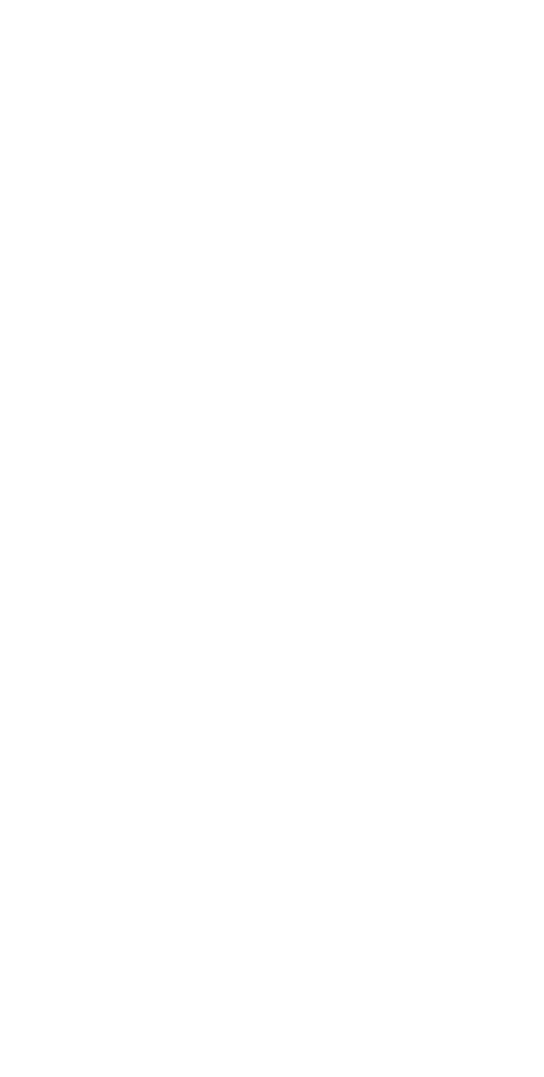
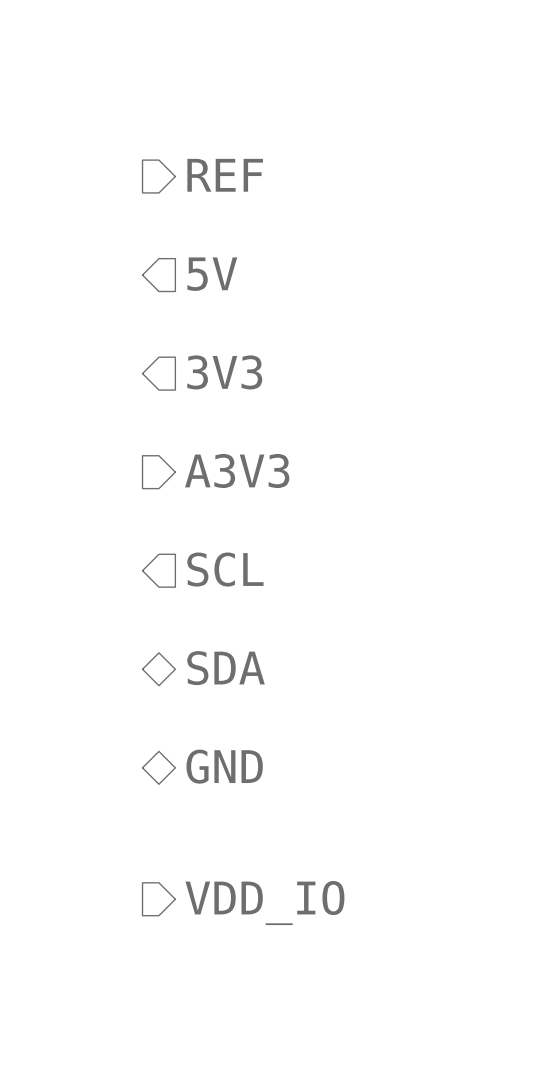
hierarchical label: none -> REF (225, 175)
hierarchical label: none -> 5V (212, 274)
hierarchical label: none -> 3V3 (224, 372)
hierarchical label: none -> A3V3 (237, 470)
hierarchical label: none -> SCL (225, 569)
hierarchical label: none -> SDA (226, 668)
hierarchical label: none -> GND (224, 766)
hierarchical label: none -> VDD_IO (264, 903)

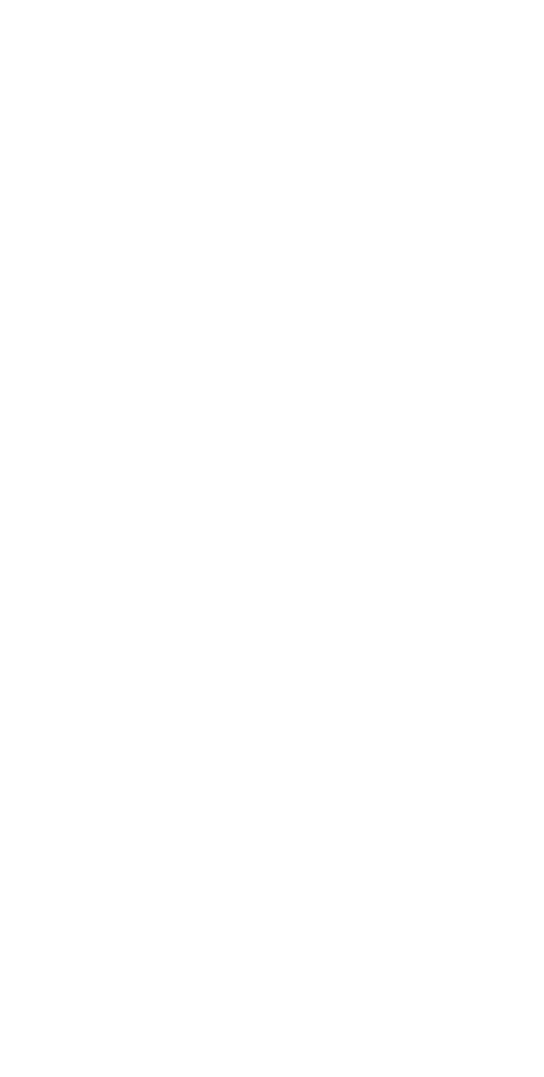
hierarchical label: REF (225, 175) -> none
hierarchical label: 5V (212, 274) -> none
hierarchical label: 3V3 (224, 372) -> none
hierarchical label: A3V3 (237, 470) -> none
hierarchical label: SCL (225, 569) -> none
hierarchical label: SDA (226, 668) -> none
hierarchical label: GND (224, 766) -> none
hierarchical label: VDD_IO (264, 903) -> none

